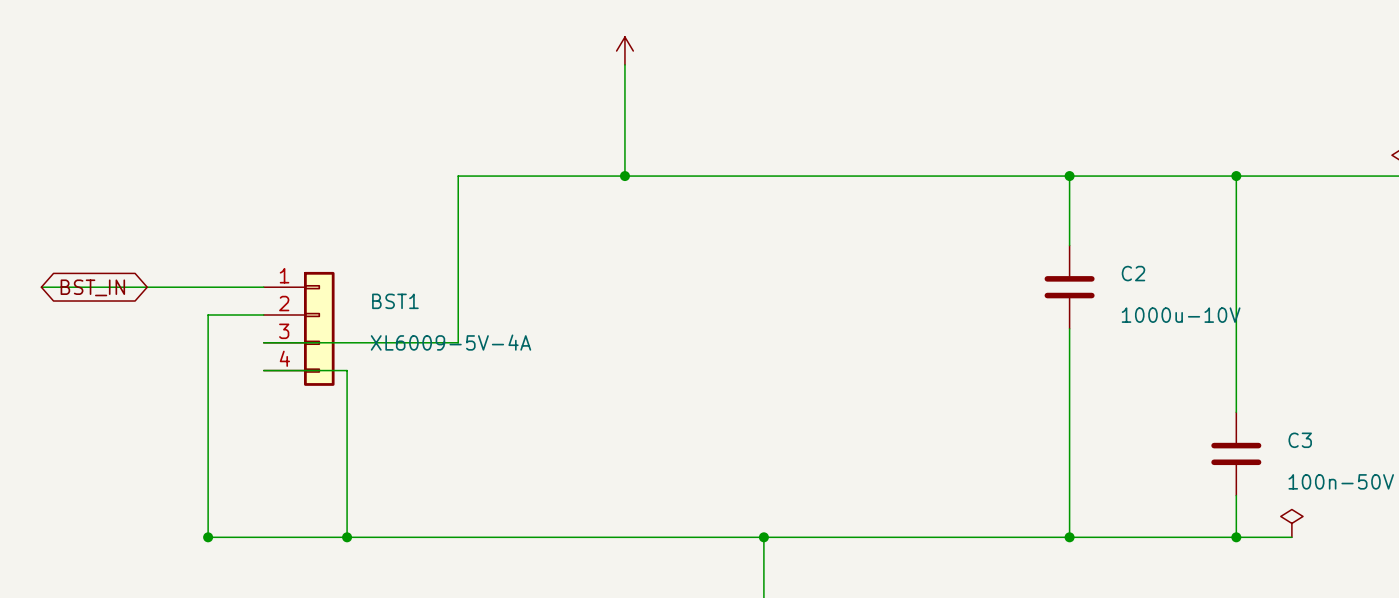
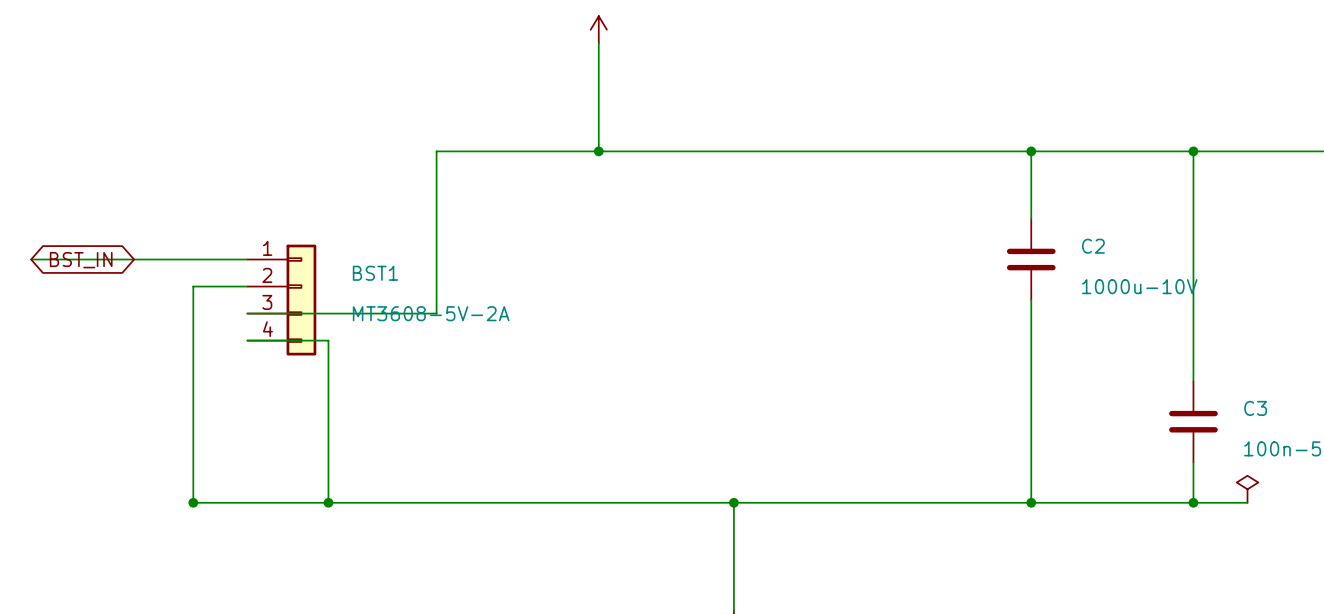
BST1 value: XL6009-5V-4A (450, 342) -> MT3608-5V-2A (431, 313)

